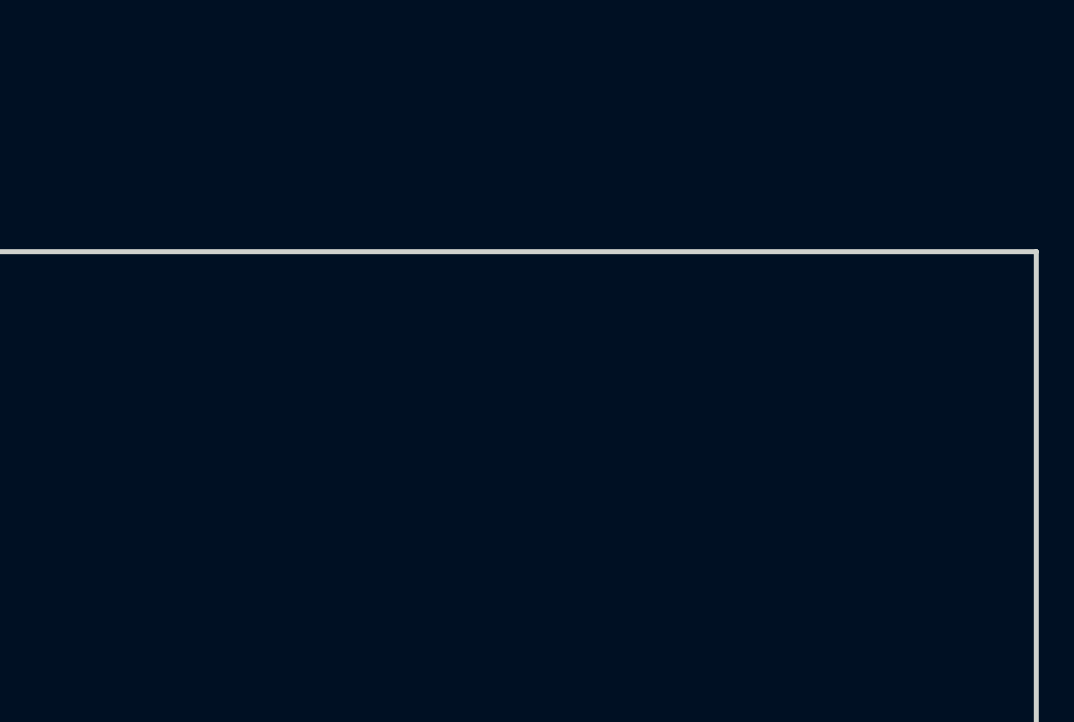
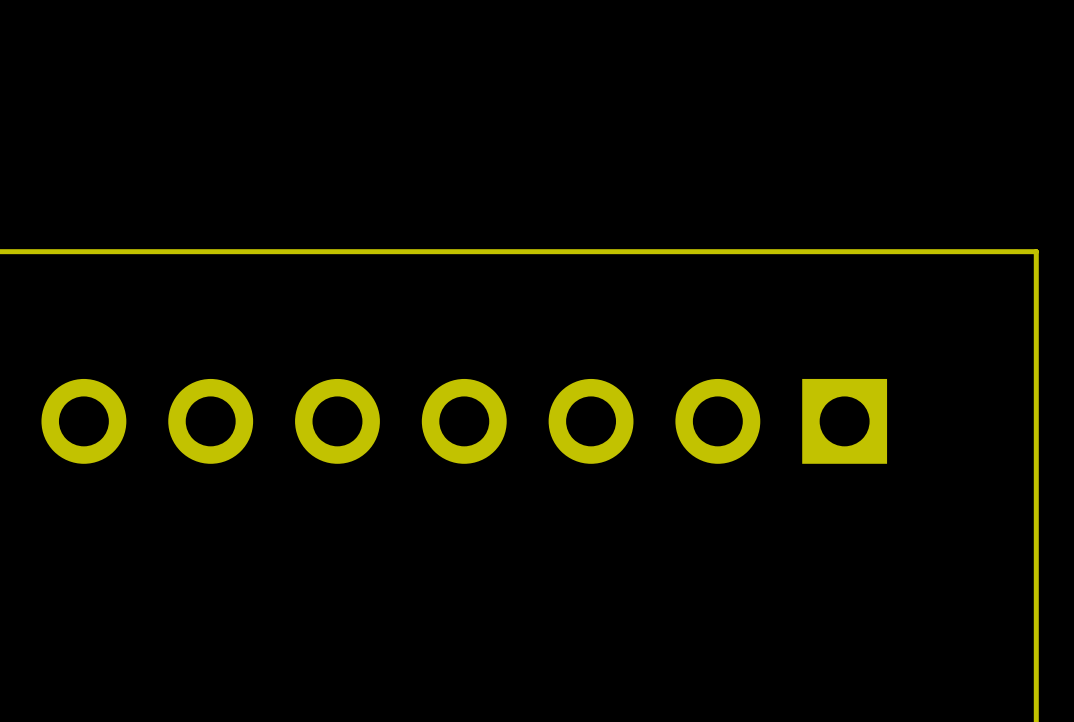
part: none -> (464, 421)

